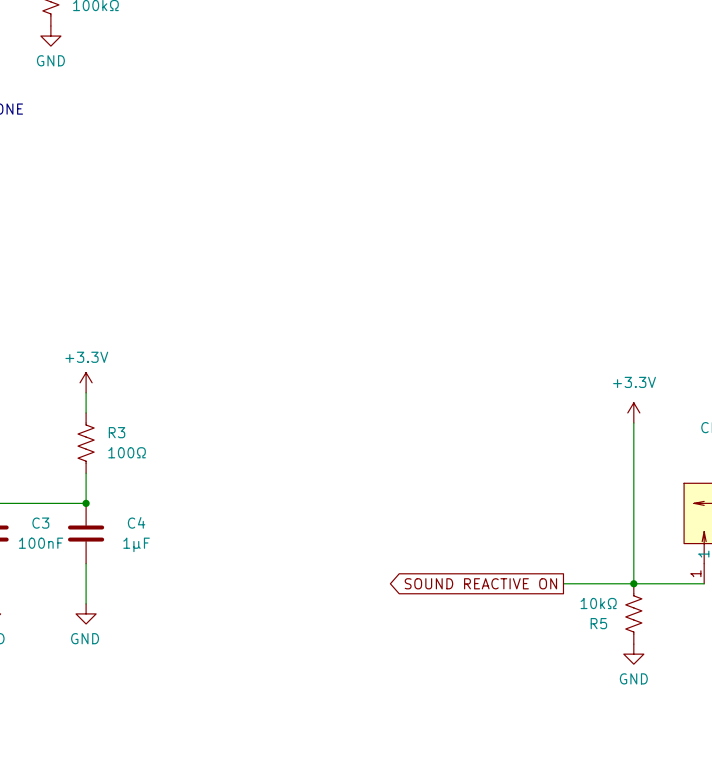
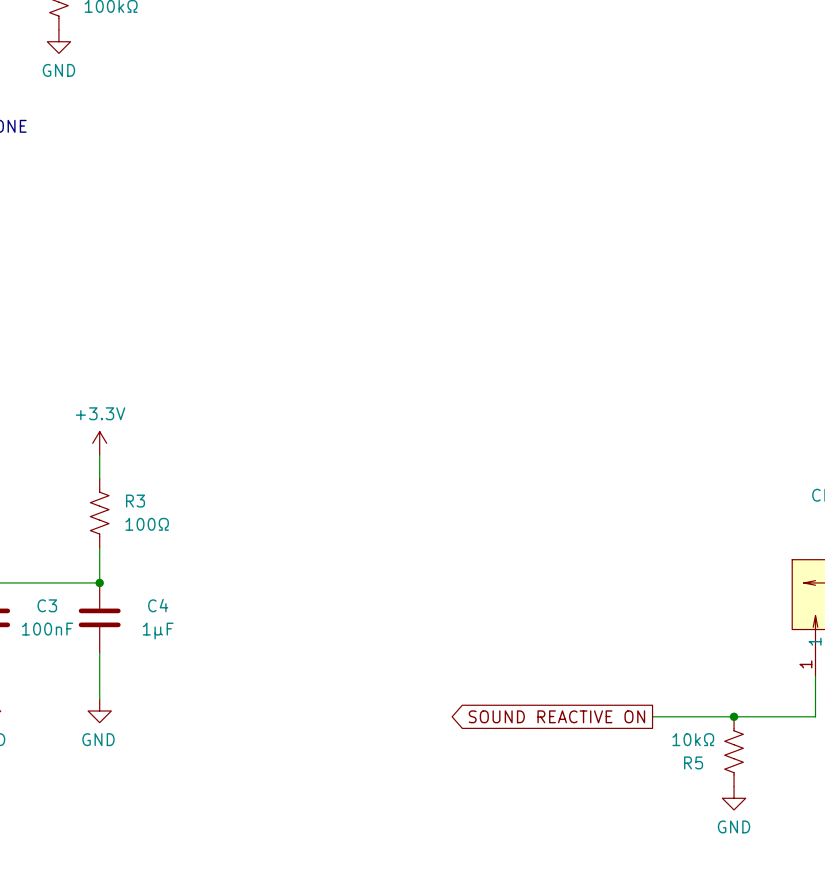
power symbol: +3.3V (633, 412) -> none
wire: (633, 422) (633, 583) -> none
global label position: SOUND REACTIVE ON (480, 583) -> SOUND REACTIVE ON (556, 716)
wire: (563, 583) (704, 583) -> (652, 716) (815, 716) (815, 676)
junction position: (633, 583) -> (734, 716)
R5 position: (633, 613) -> (734, 751)
power symbol position: GND (633, 654) -> GND (734, 798)

